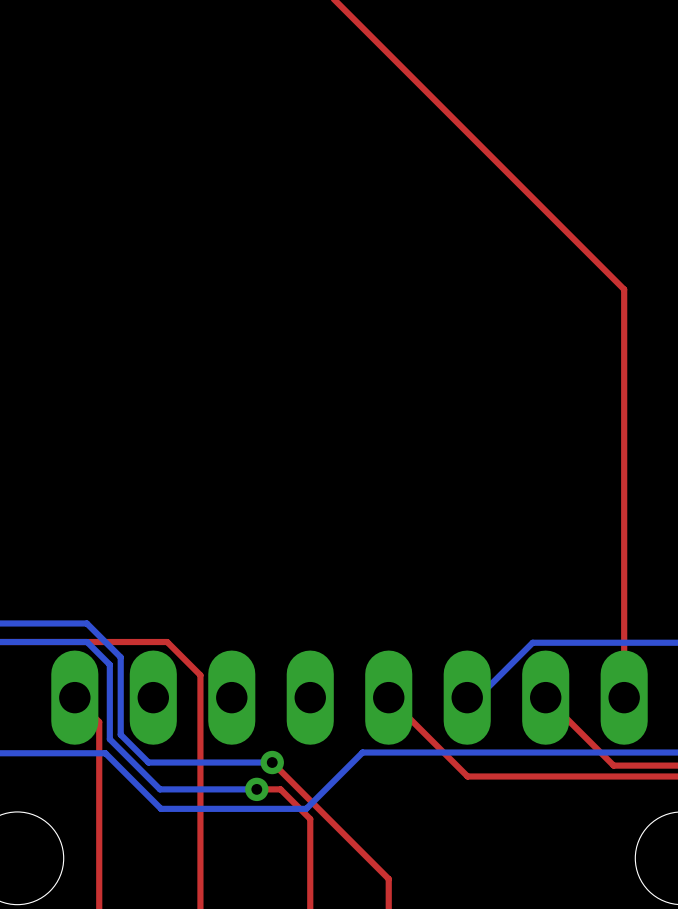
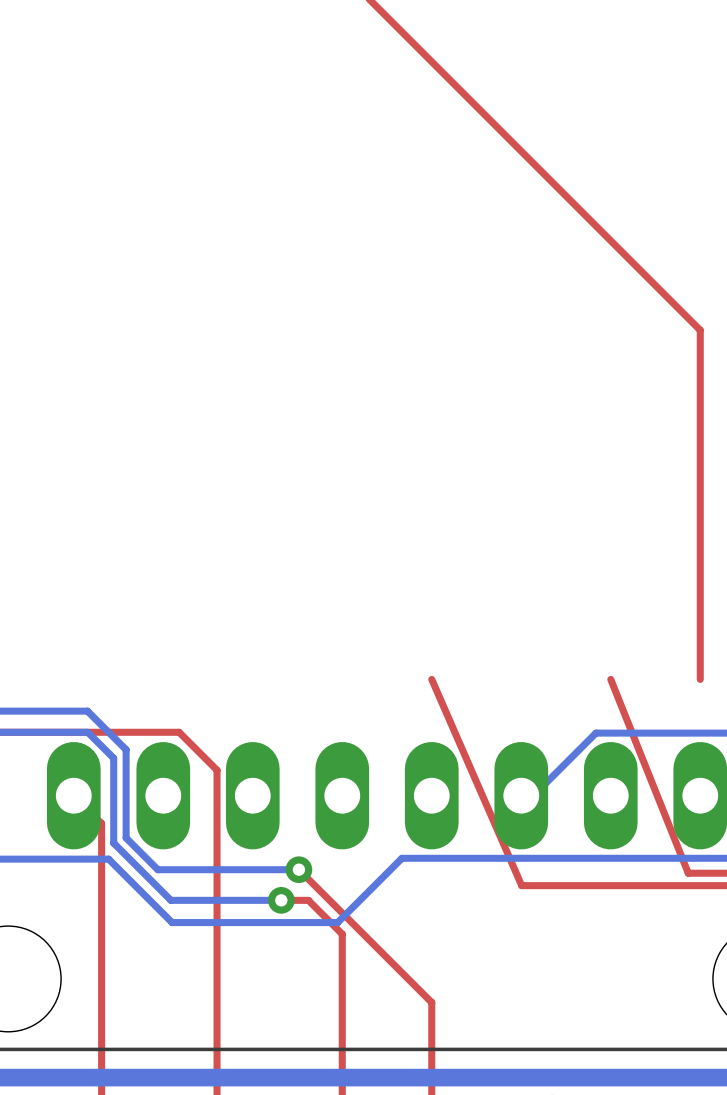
top track: (624, 595) (624, 697) -> none
top track: (388, 697) (467, 776) -> (431, 679) (521, 885)
top track: (545, 697) (613, 765) -> (610, 679) (688, 873)

